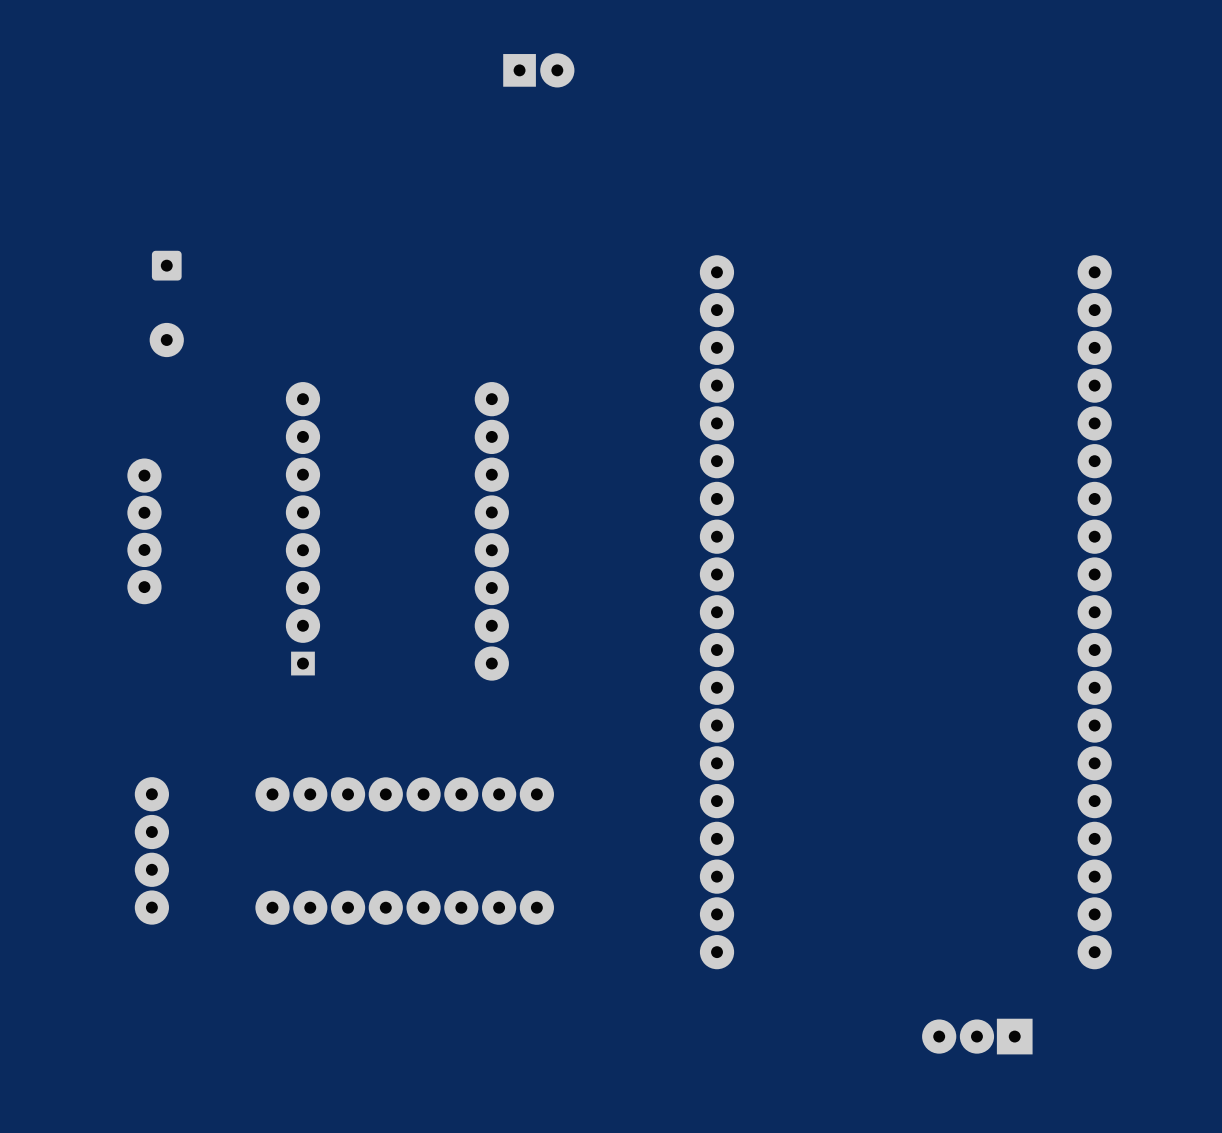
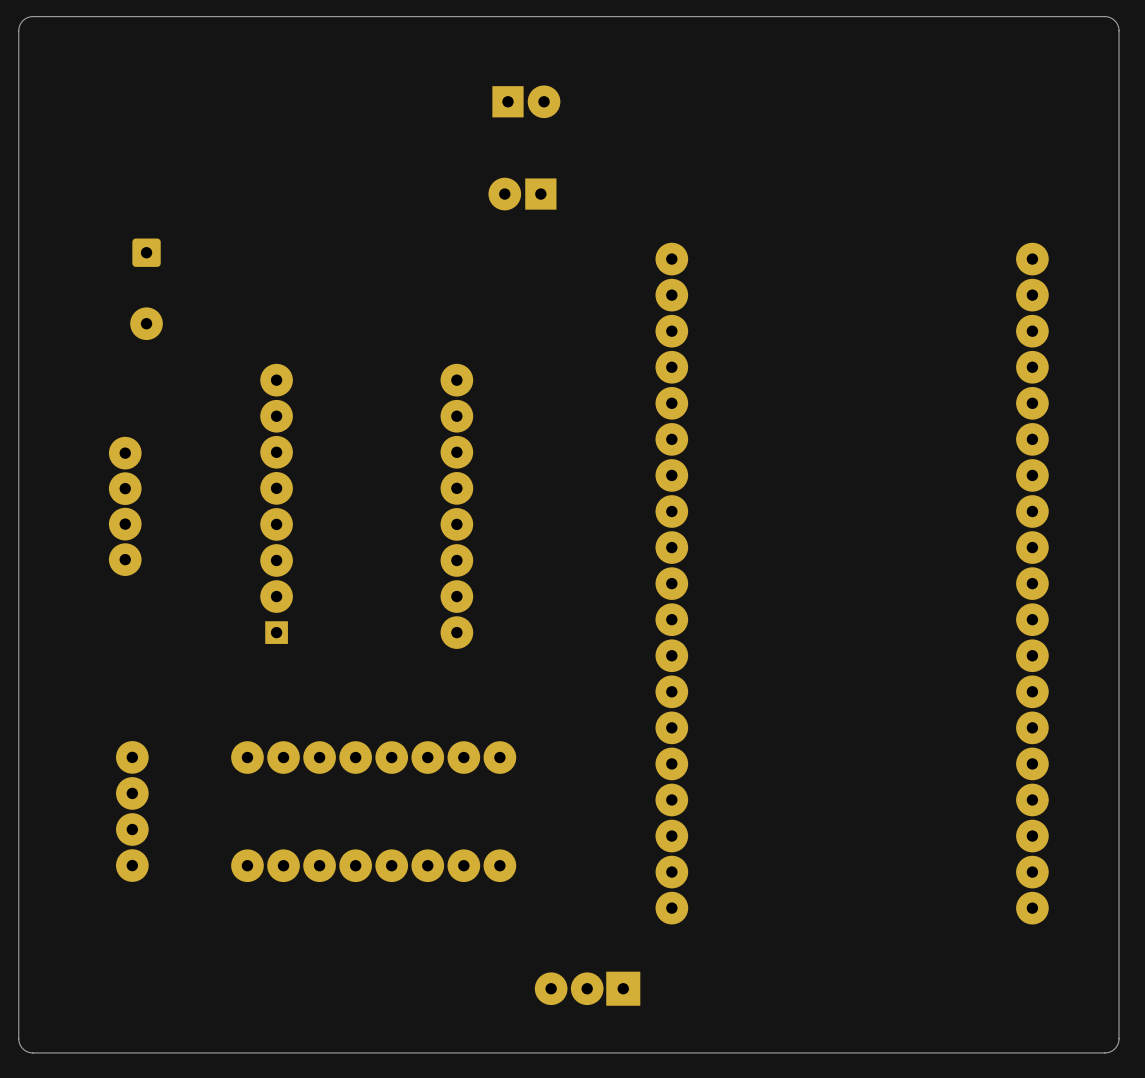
board edge: none -> (1104, 16) (32, 16) (22, 20) (18, 30) (18, 1038) (22, 1048) (32, 1052) (1104, 1052) (1114, 1048) (1119, 1038) (1119, 30) (1114, 20) (1104, 16)
part position: (538, 70) -> (526, 101)
part: none -> (522, 194)
part position: (977, 1036) -> (587, 988)

